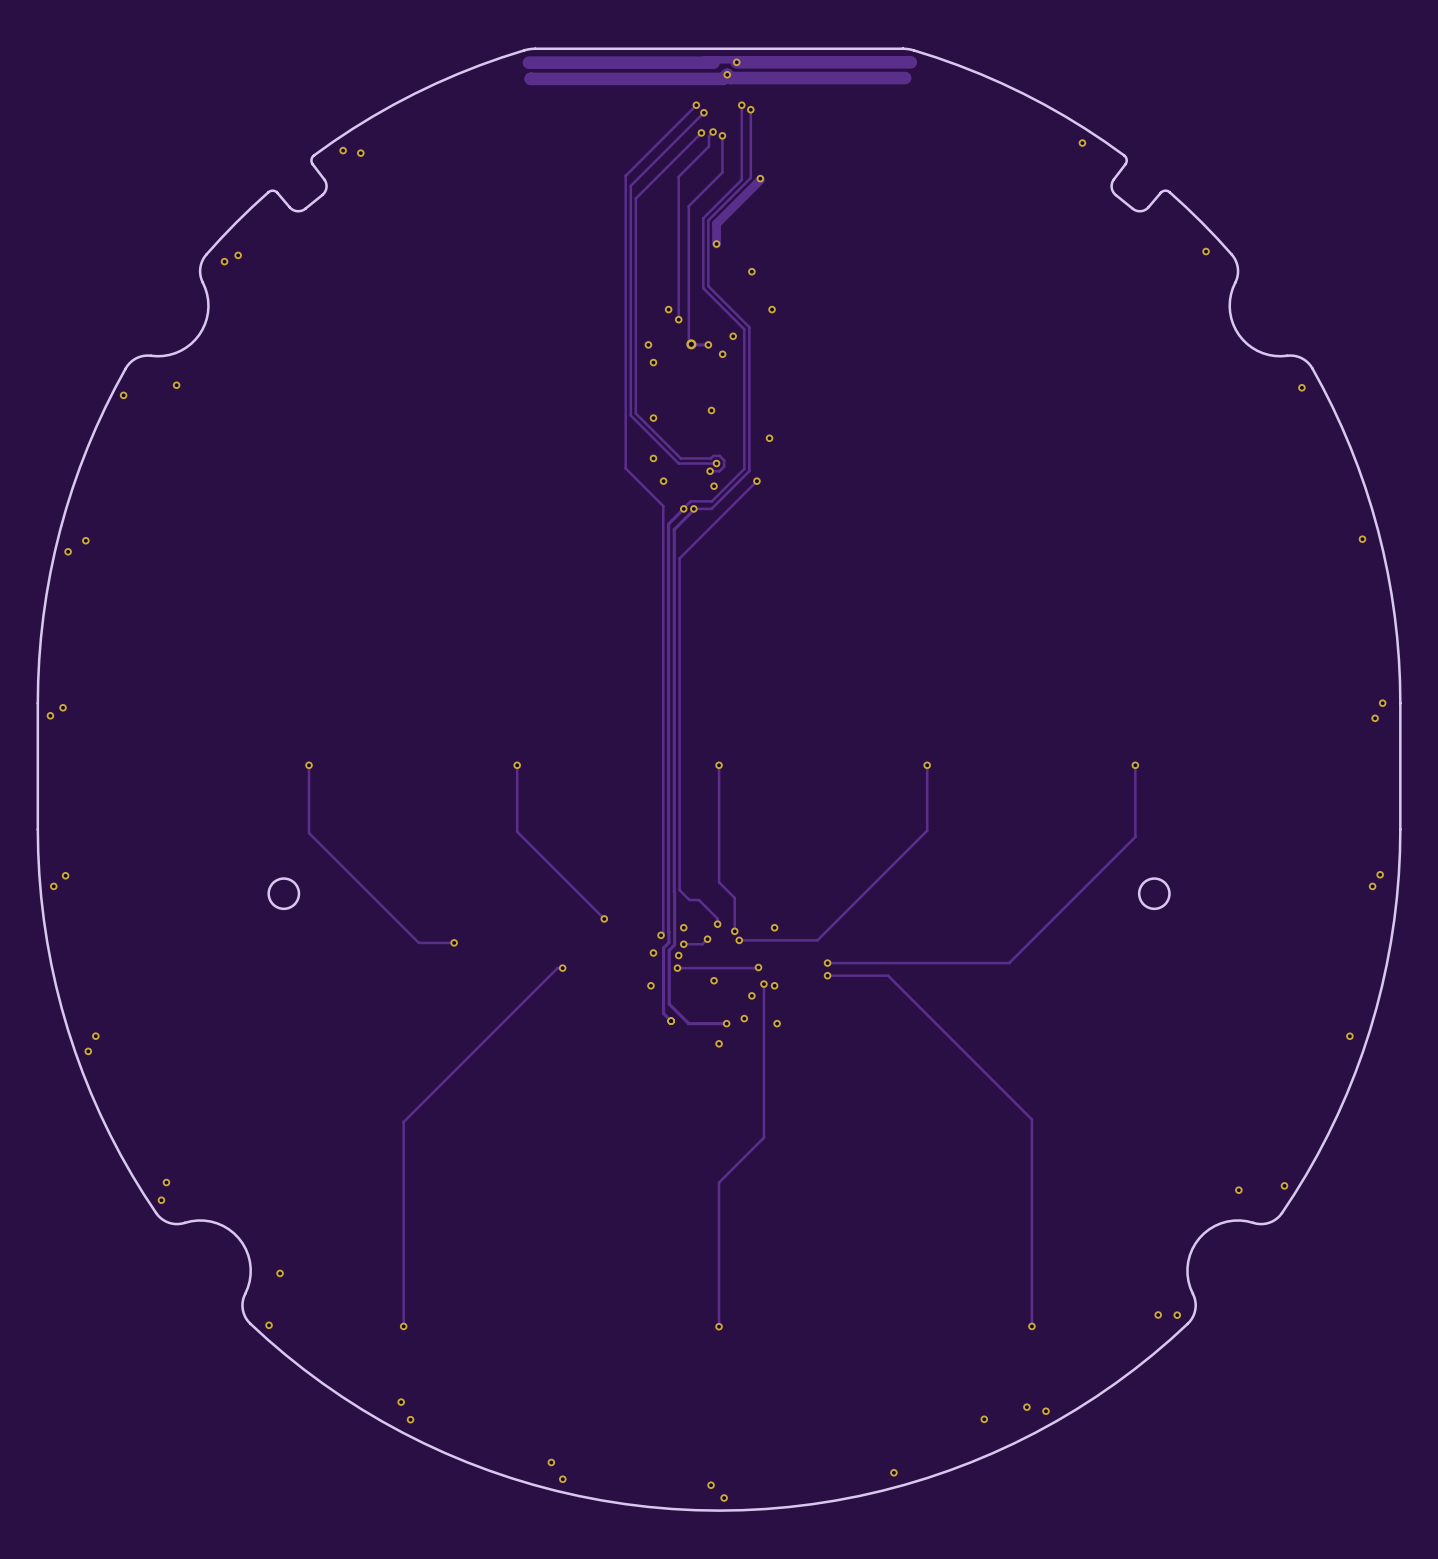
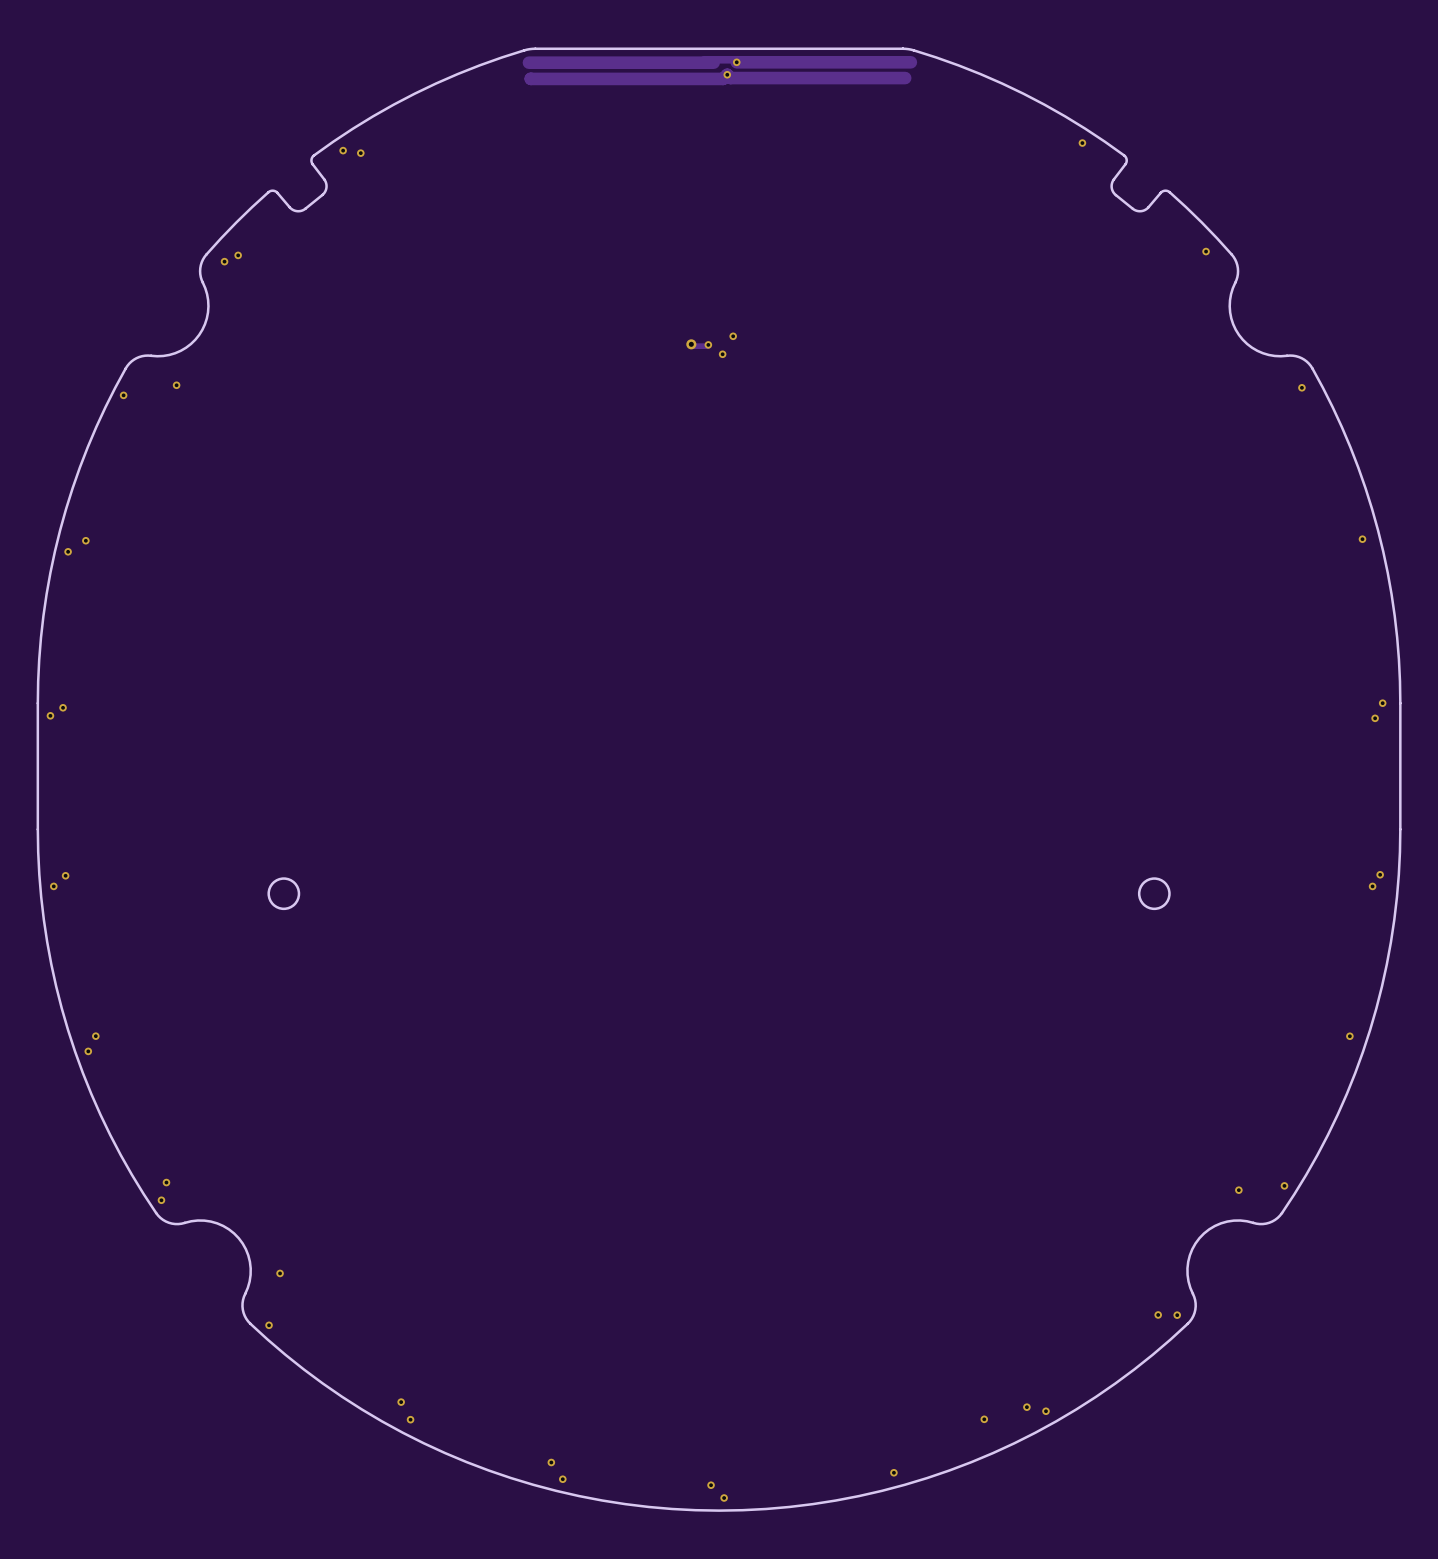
track: (696, 105) (625, 175) (625, 468) (663, 506) (663, 933) (661, 935) -> none
via: (696, 105) -> none
track: (741, 105) (741, 179) (703, 218) (703, 288) (744, 329) (744, 468) (711, 501) (690, 501) (668, 524) (668, 942) (663, 947) (663, 1013) (671, 1021) -> none
via: (741, 105) -> none
track: (750, 109) (750, 177) (708, 220) (708, 286) (749, 327) (749, 471) (711, 508) (693, 508) (674, 529) (674, 944) (669, 950) (669, 1004) (688, 1023) (726, 1023) -> none
via: (750, 109) -> none
track: (703, 112) (630, 185) (630, 415) (678, 463) (716, 463) -> none
via: (703, 112) -> none
track: (701, 132) (635, 198) (635, 413) (680, 458) (710, 458) (713, 455) (719, 455) (724, 460) (724, 466) (719, 471) (710, 471) -> none
via: (701, 132) -> none
track: (713, 132) (708, 136) (708, 146) (678, 176) (678, 319) -> none
via: (713, 132) -> none
track: (722, 135) (722, 172) (688, 206) (688, 344) (691, 346) -> (708, 347) (691, 346)
via: (722, 135) -> none
track: (760, 178) (716, 223) (716, 243) -> none
via: (760, 178) -> none
via: (716, 243) -> none
via: (751, 271) -> none
via: (668, 309) -> none
via: (772, 309) -> none
via: (678, 319) -> none
via: (648, 344) -> none
via: (653, 362) -> none
via: (711, 410) -> none
via: (653, 418) -> none
via: (769, 438) -> none
via: (653, 458) -> none
via: (716, 463) -> none
via: (710, 471) -> none
via: (663, 481) -> none
track: (756, 481) (679, 558) (679, 890) (689, 900) (698, 900) (717, 918) (717, 924) -> none
via: (756, 481) -> none
via: (714, 486) -> none
via: (683, 508) -> none
via: (693, 508) -> none
track: (309, 765) (309, 833) (418, 942) (454, 942) -> none
via: (309, 765) -> none
track: (517, 765) (517, 831) (604, 918) -> none
via: (517, 765) -> none
track: (719, 765) (719, 882) (734, 898) (734, 931) -> none
via: (719, 765) -> none
track: (927, 765) (927, 830) (817, 940) (739, 940) -> none
via: (927, 765) -> none
track: (1135, 765) (1135, 836) (1009, 963) (827, 963) -> none
via: (1135, 765) -> none
via: (604, 918) -> none
via: (717, 924) -> none
via: (683, 927) -> none
via: (774, 927) -> none
via: (734, 931) -> none
via: (661, 935) -> none
track: (707, 939) (702, 944) (683, 944) -> none
via: (707, 939) -> none
via: (739, 940) -> none
via: (454, 942) -> none
via: (683, 944) -> none
via: (653, 952) -> none
via: (678, 955) -> none
via: (827, 963) -> none
track: (758, 967) (677, 968) -> none
via: (758, 967) -> none
track: (562, 968) (557, 968) (403, 1122) (403, 1326) -> none
via: (562, 968) -> none
via: (677, 968) -> none
track: (827, 975) (888, 975) (1031, 1119) (1031, 1326) -> none
via: (827, 975) -> none
via: (714, 980) -> none
track: (763, 984) (763, 1137) (719, 1182) (719, 1326) -> none
via: (763, 984) -> none
via: (650, 985) -> none
via: (774, 985) -> none
via: (751, 995) -> none
via: (744, 1018) -> none
via: (671, 1021) -> none
via: (726, 1023) -> none
via: (777, 1023) -> none
via: (719, 1043) -> none
via: (403, 1326) -> none
via: (719, 1326) -> none
via: (1031, 1326) -> none

